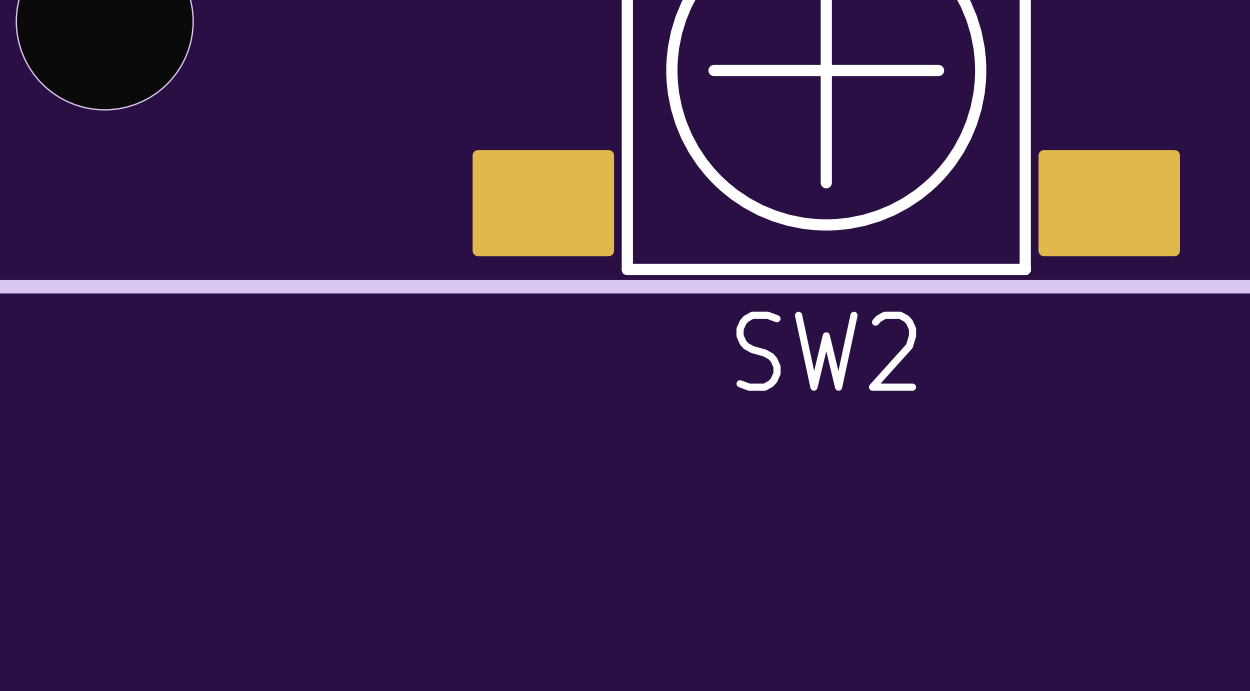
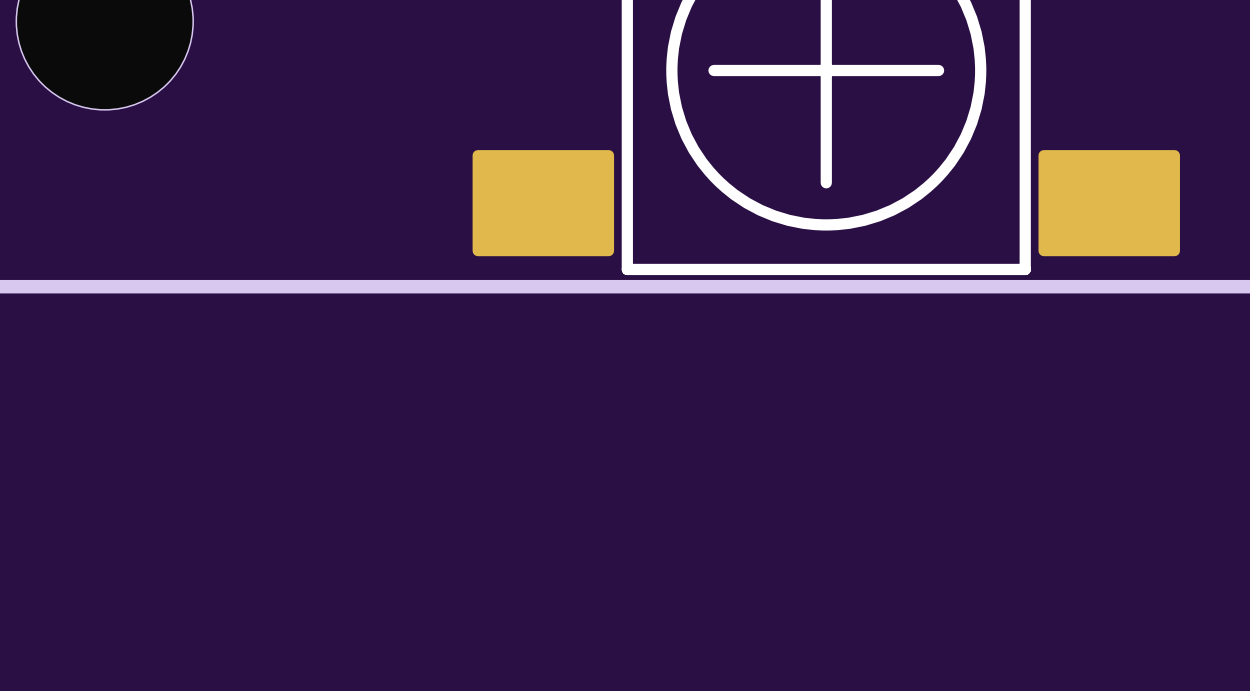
SW2 name: SW2 (826, 351) -> none

